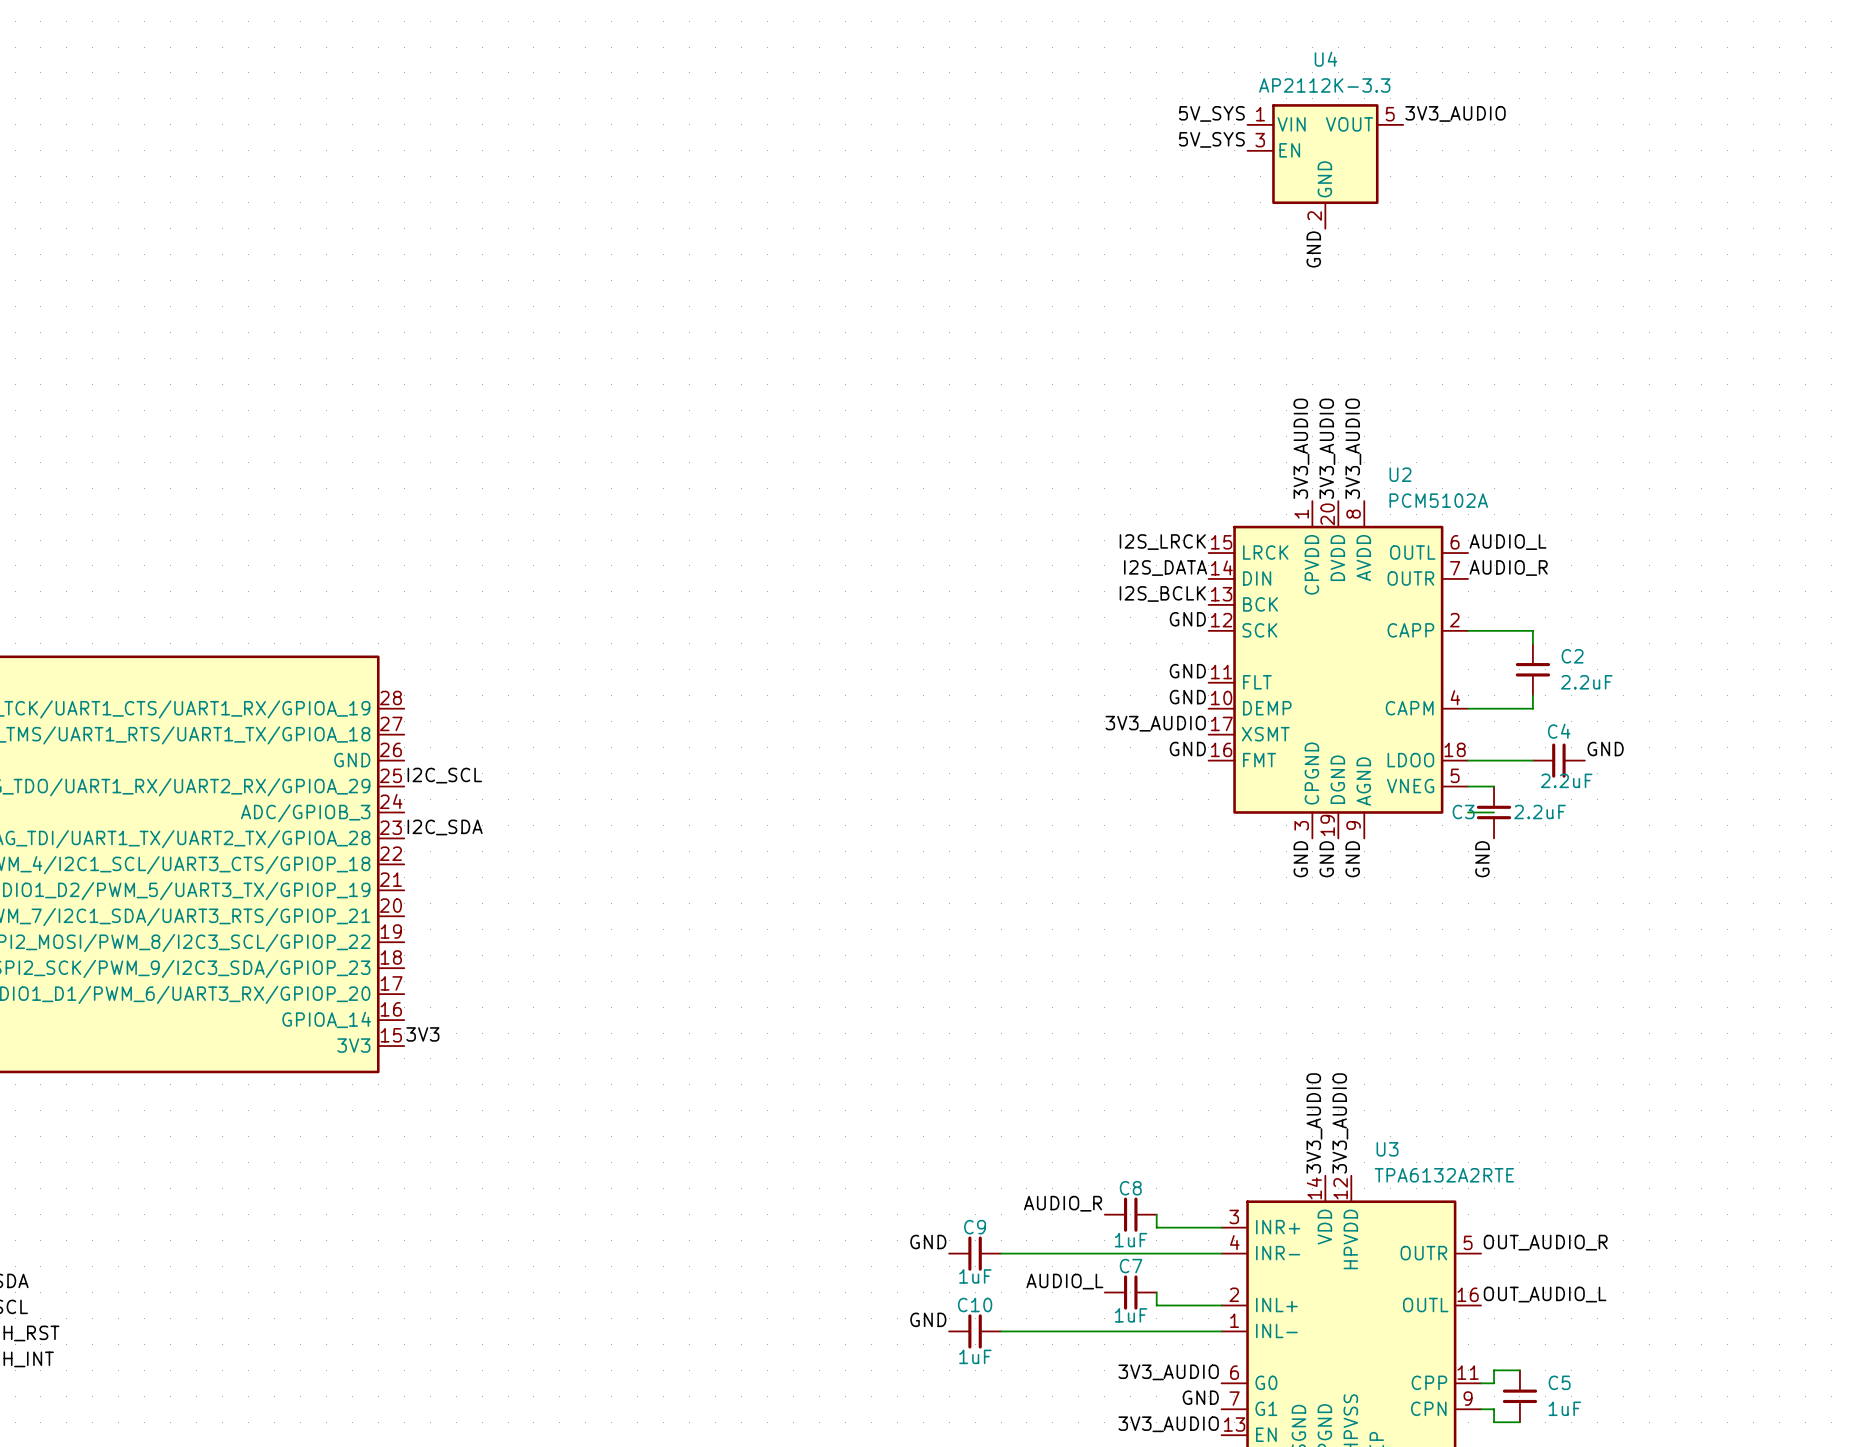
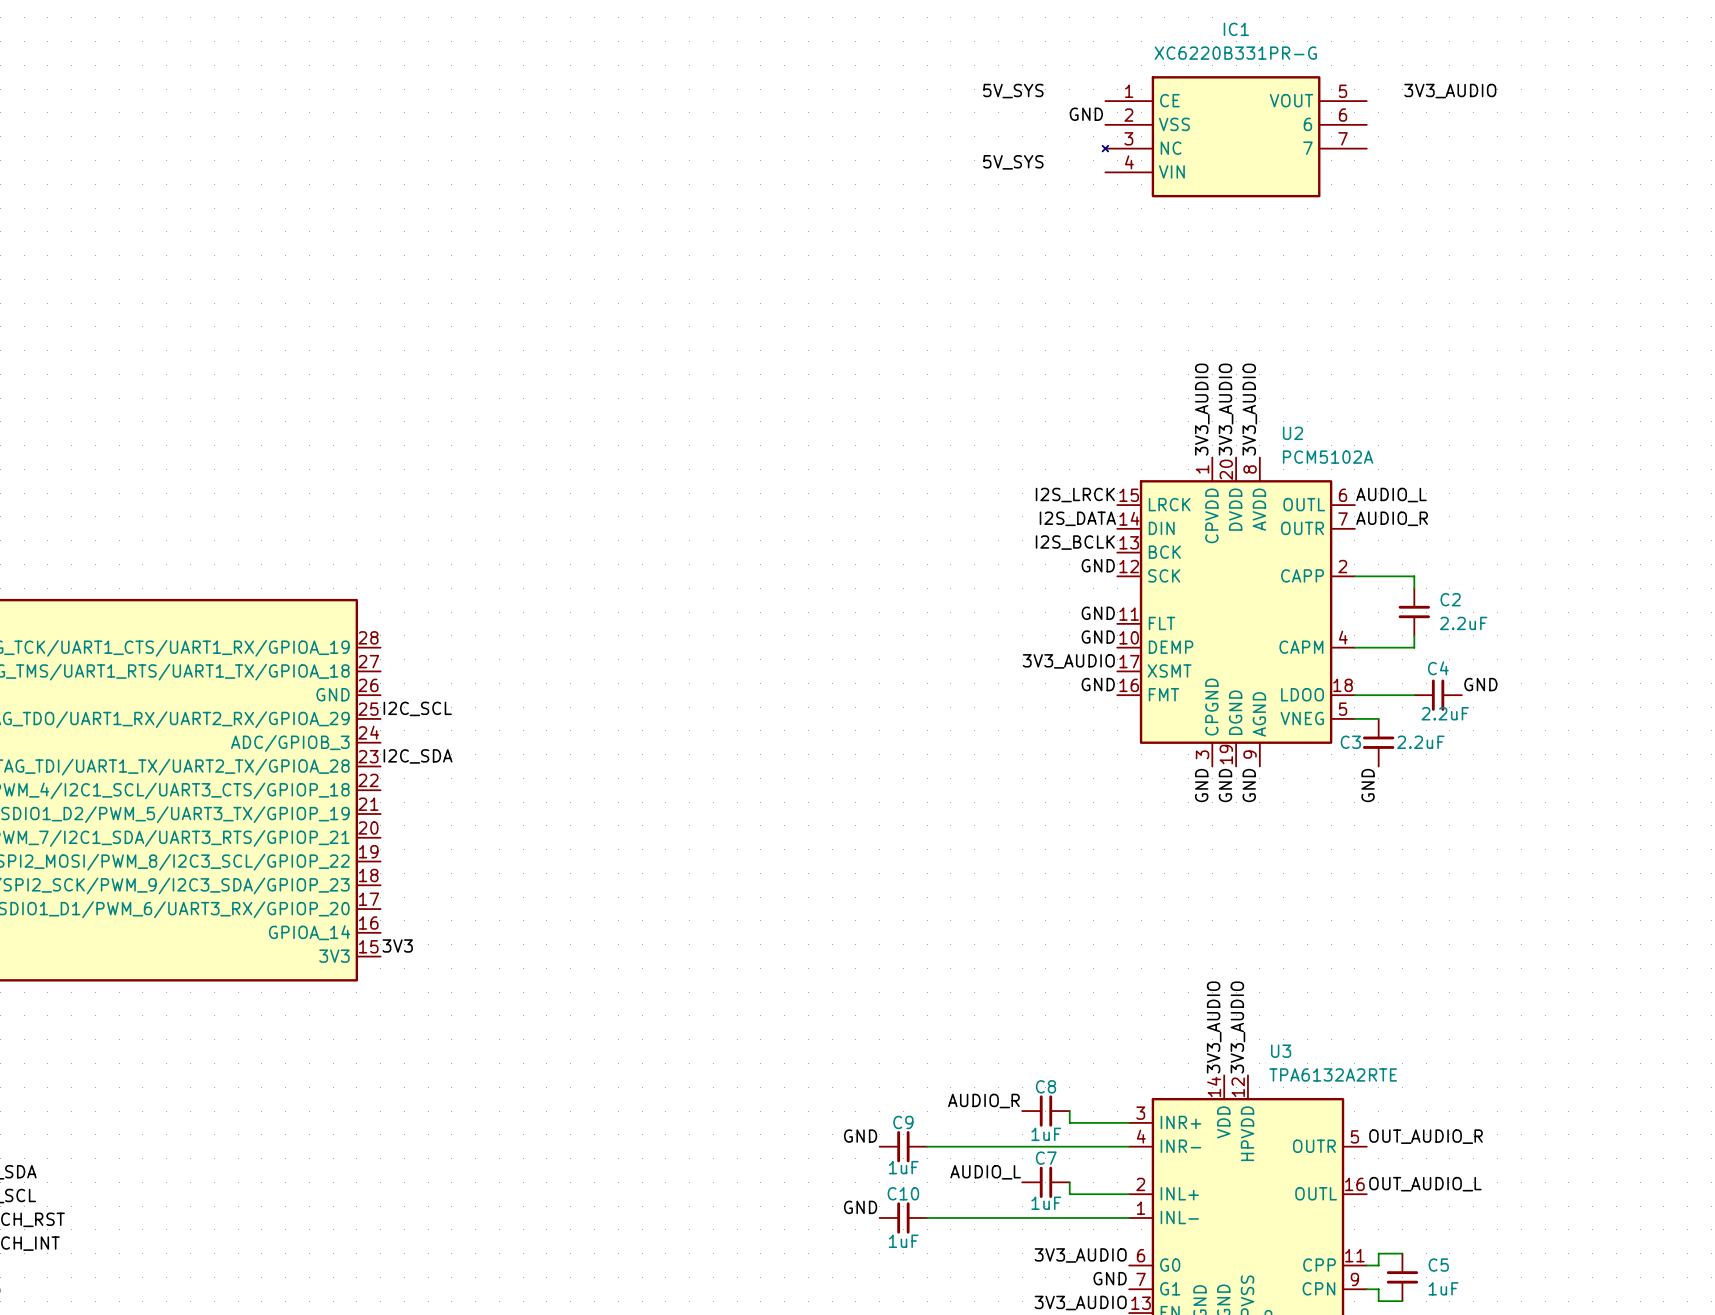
label: none -> 5V_SYS (1013, 91)
label: 5V_SYS (1211, 113) -> none
label position: 3V3_AUDIO (1455, 113) -> 3V3_AUDIO (1450, 91)
label: 5V_SYS (1211, 139) -> none
IC1: none -> XC6220B331PR-G (1234, 136)
U4: AP2112K-3.3 (1325, 166) -> none
label: none -> 5V_SYS (1013, 162)
label rotation: 0° (1313, 249) -> 90° clockwise (1086, 114)
label position: GND (1313, 249) -> GND (1086, 114)
wire: (1468, 812) (1494, 812) -> none

